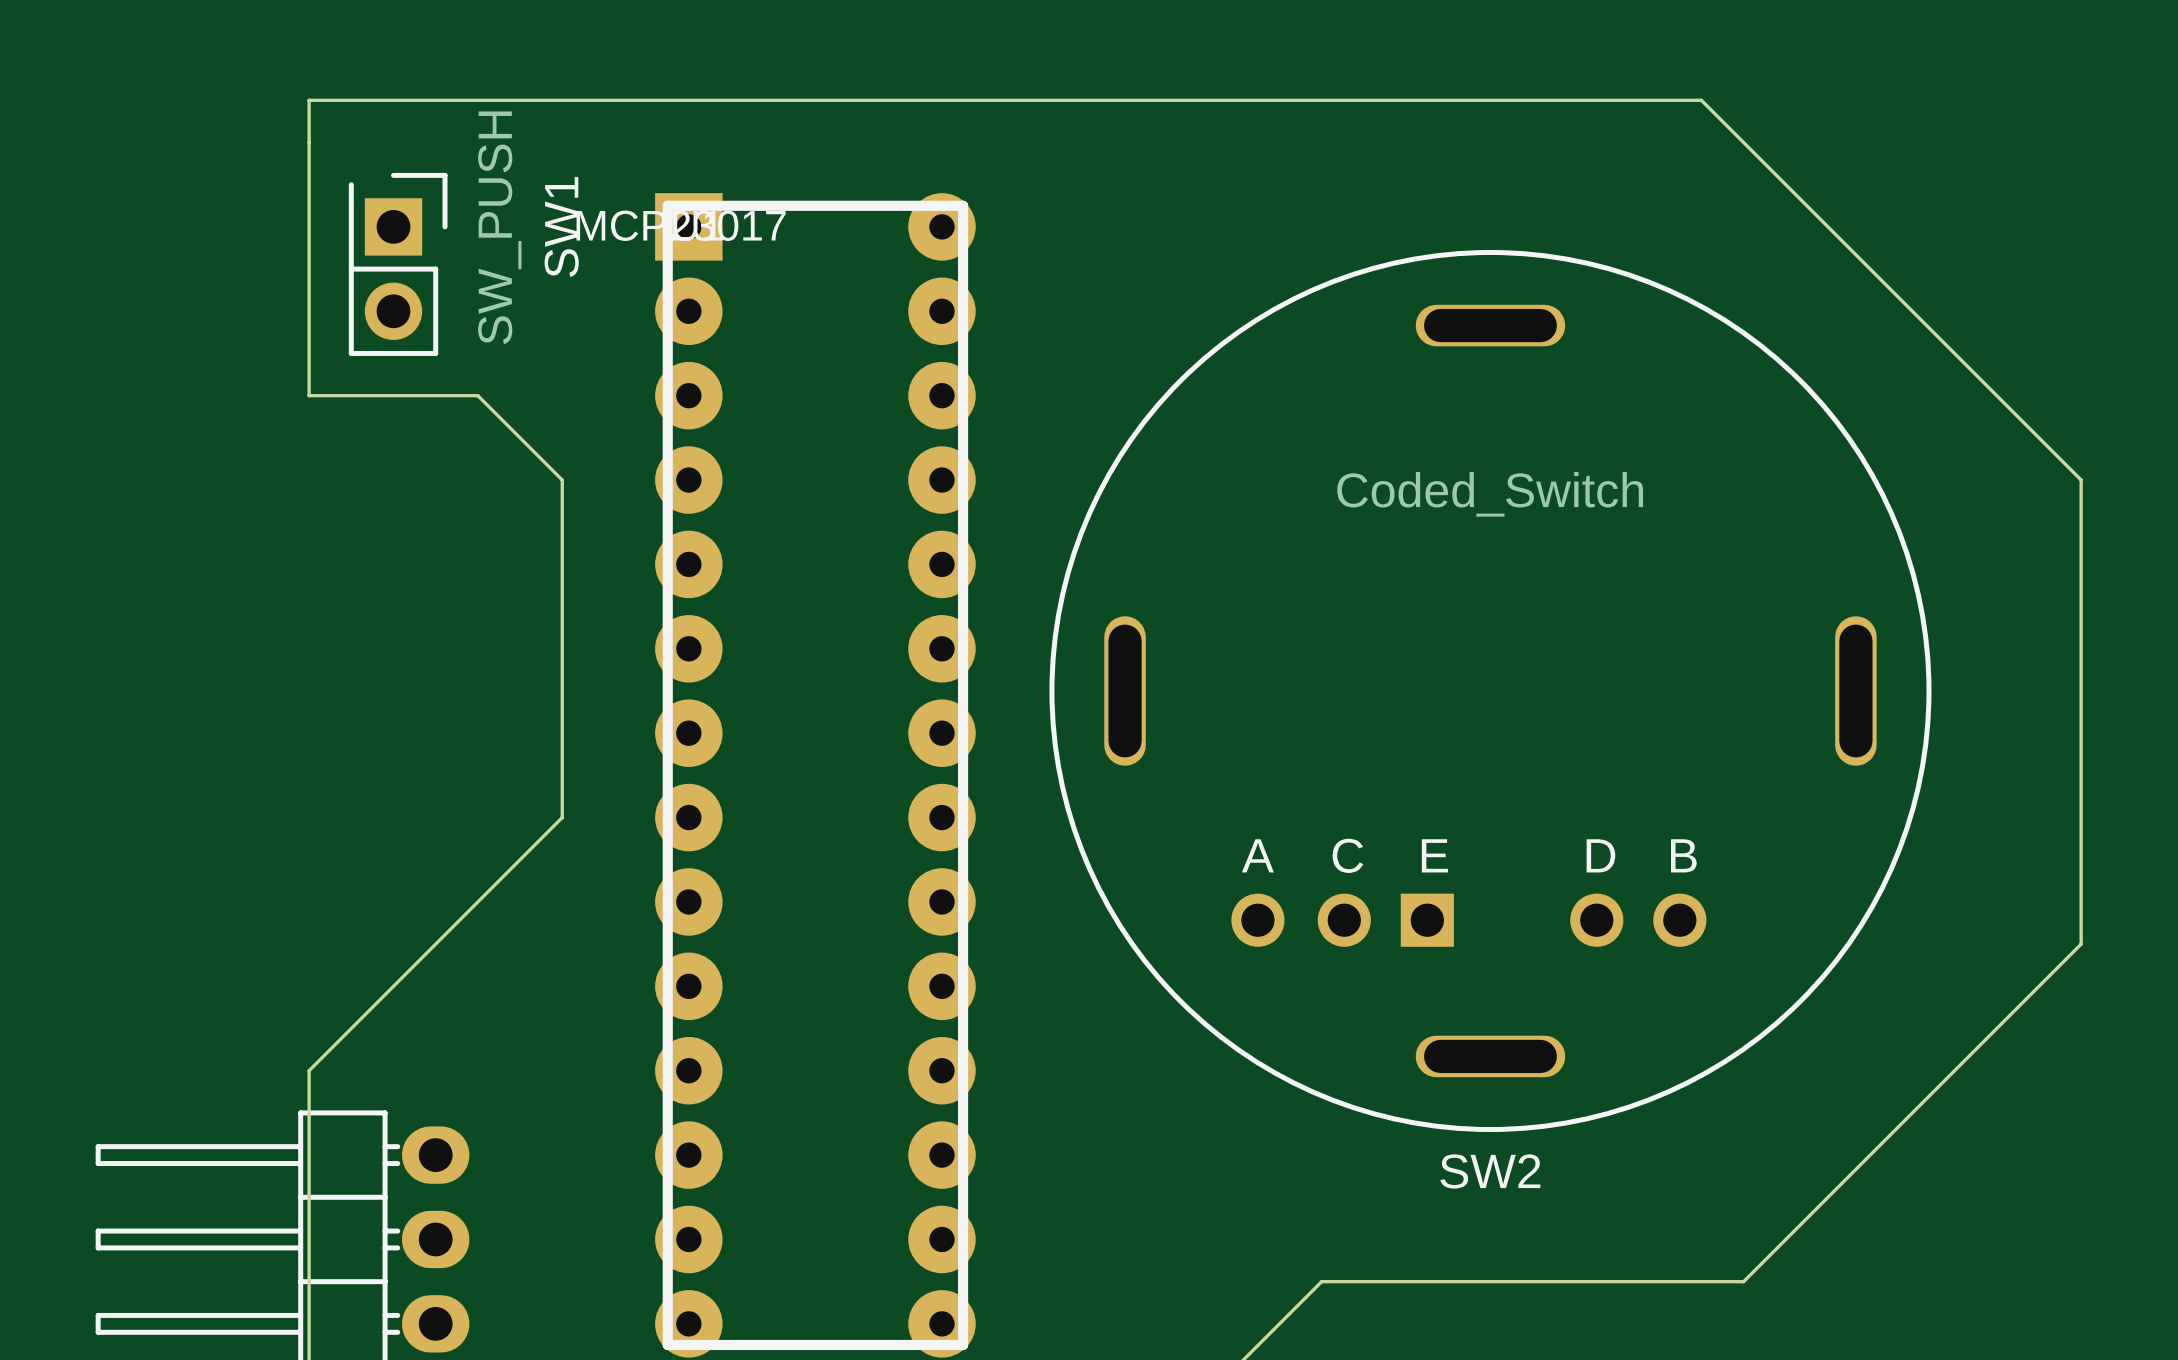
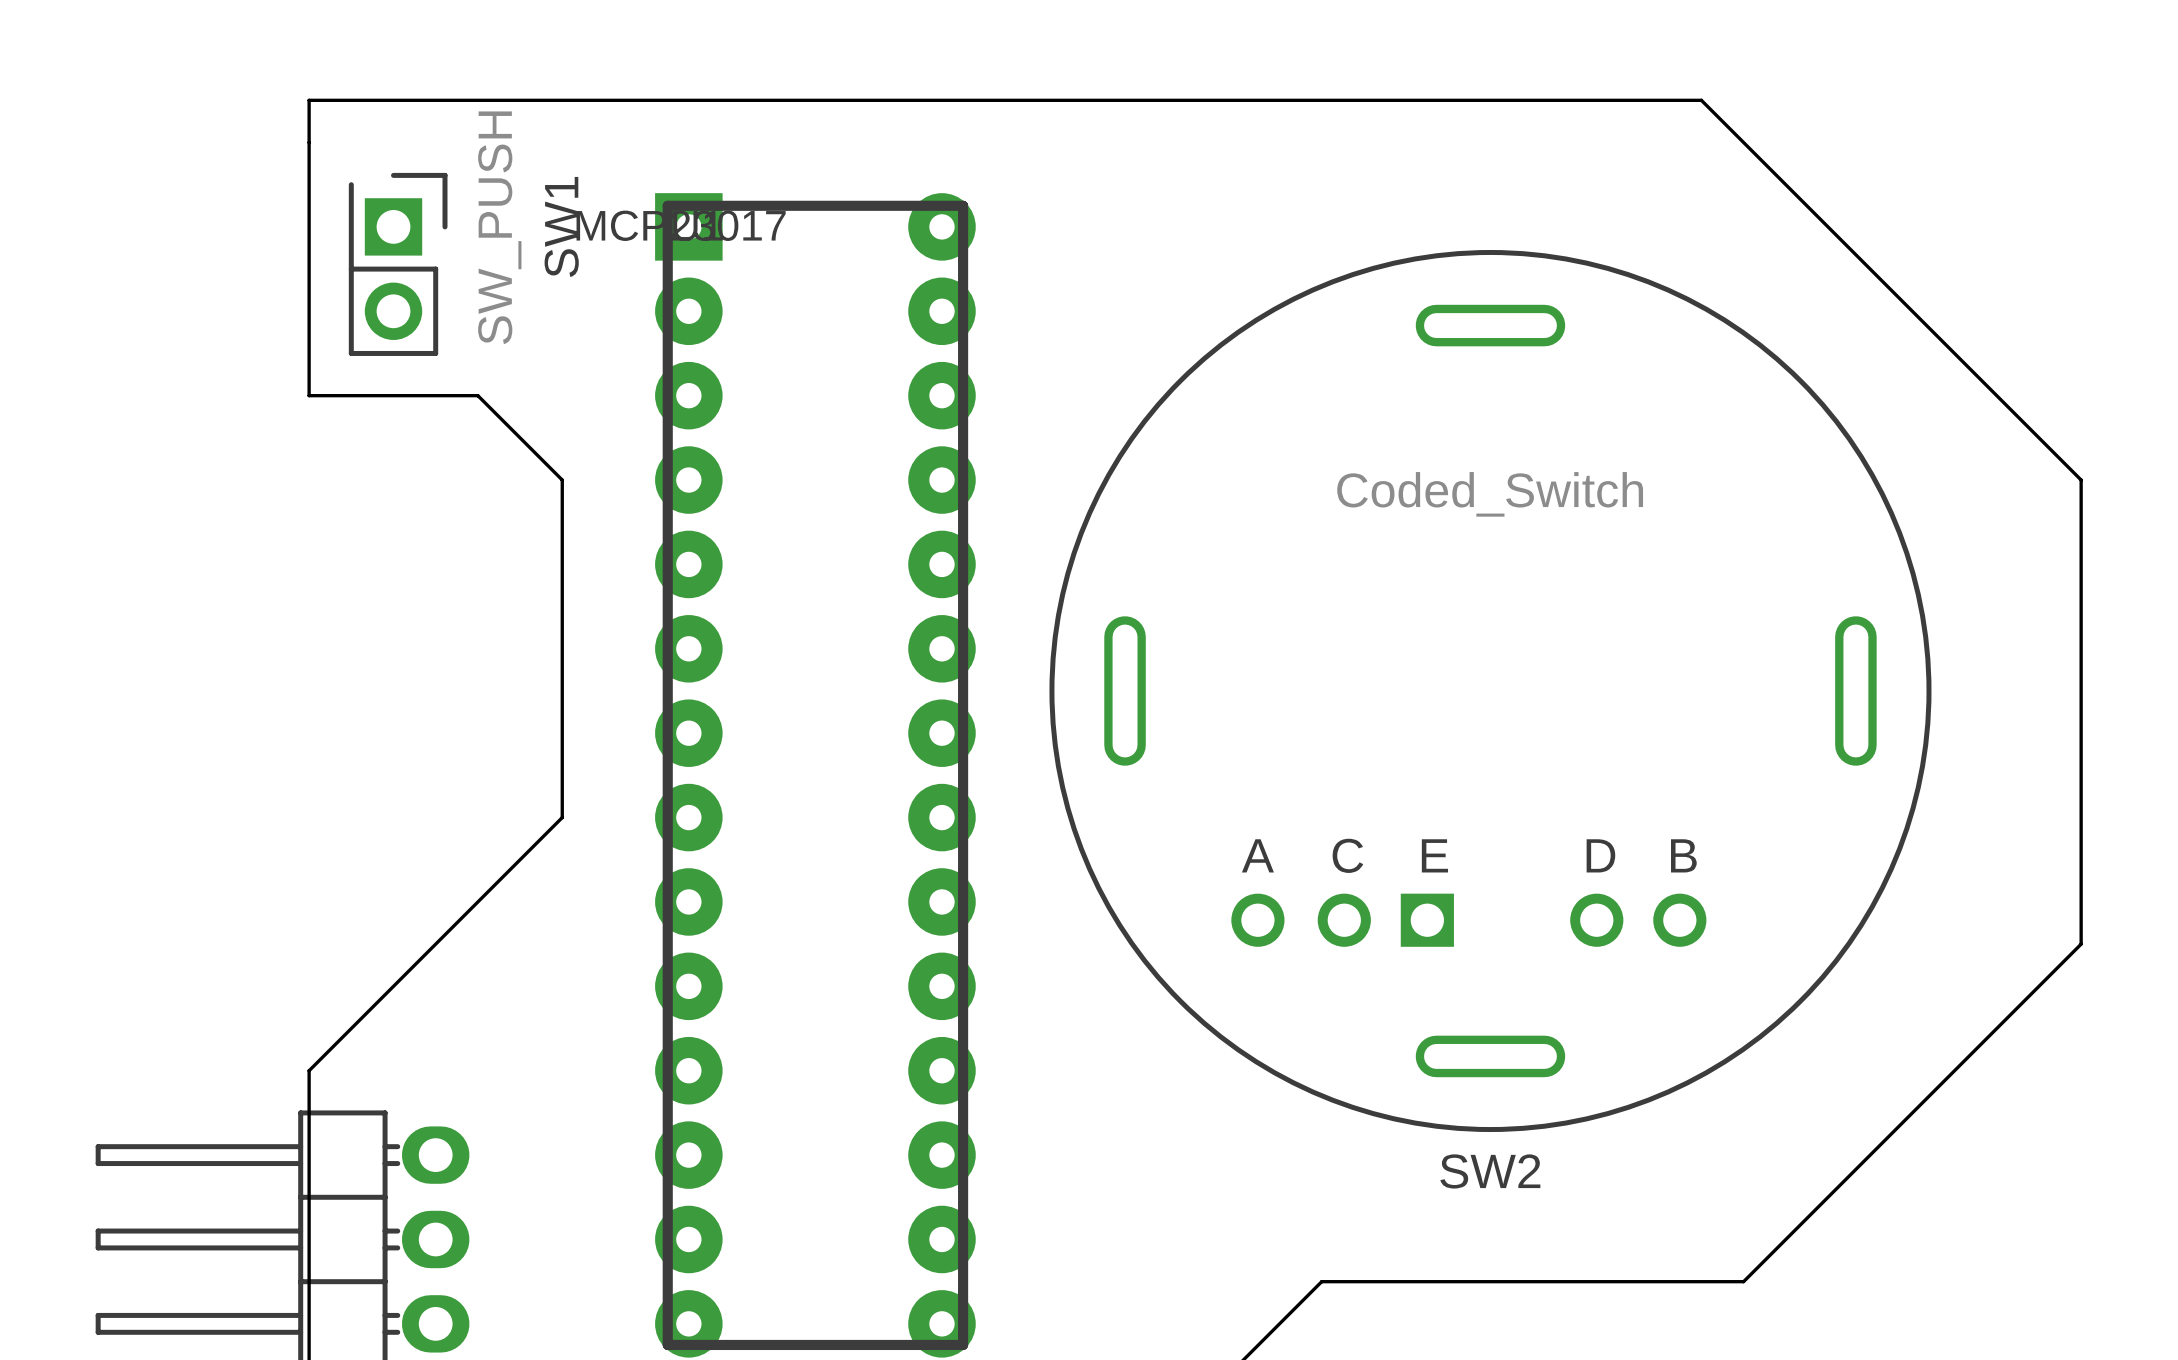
SW2 footprint: [1049, 249, 1932, 1133] -> [1049, 249, 1932, 1133]

